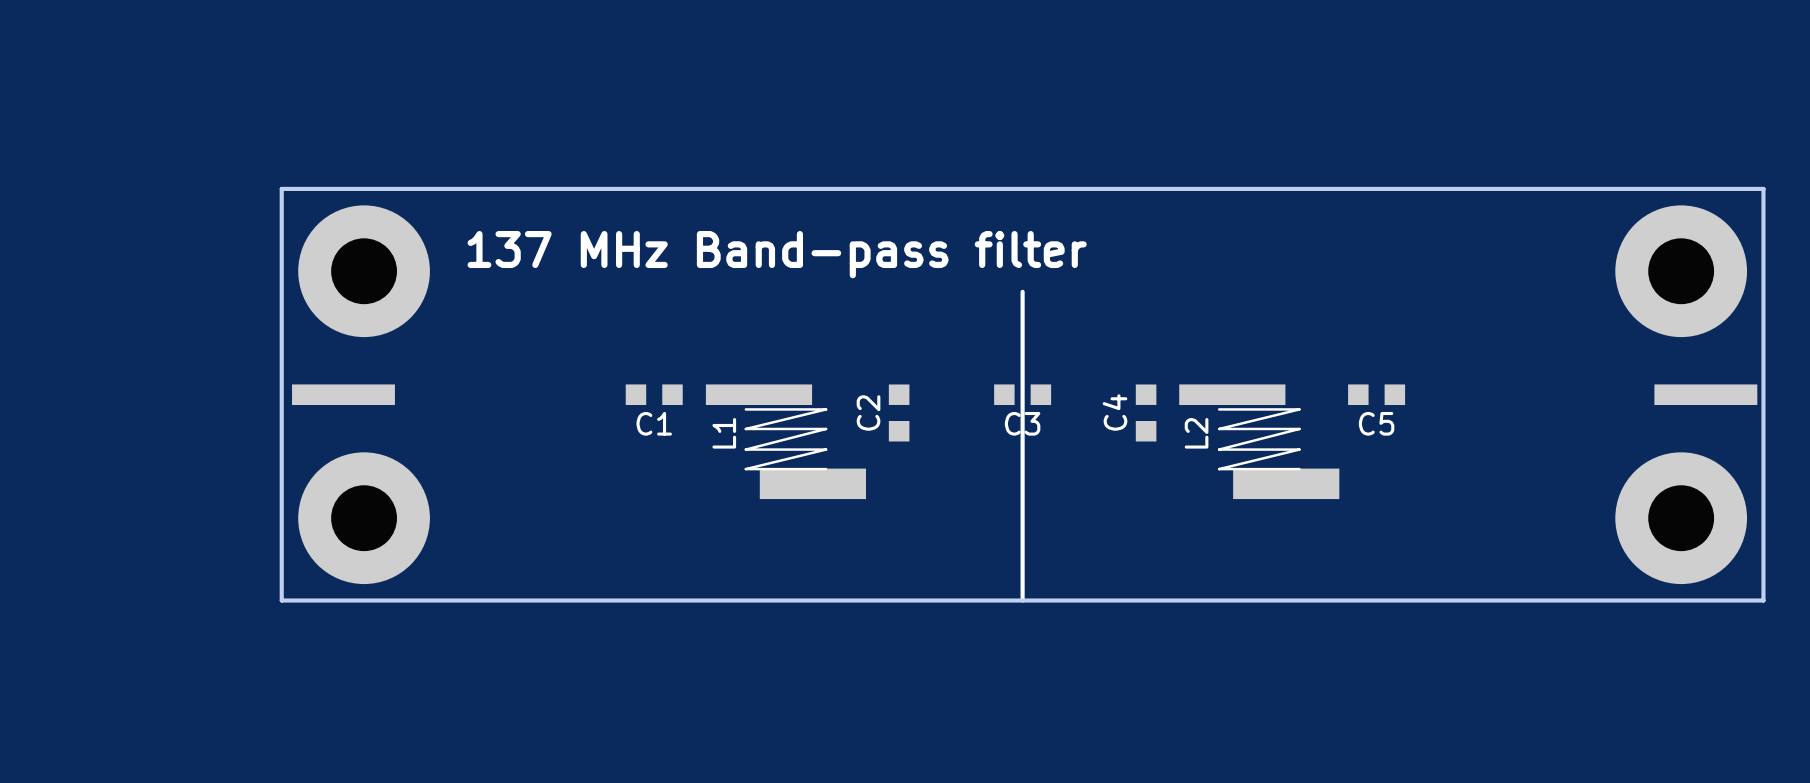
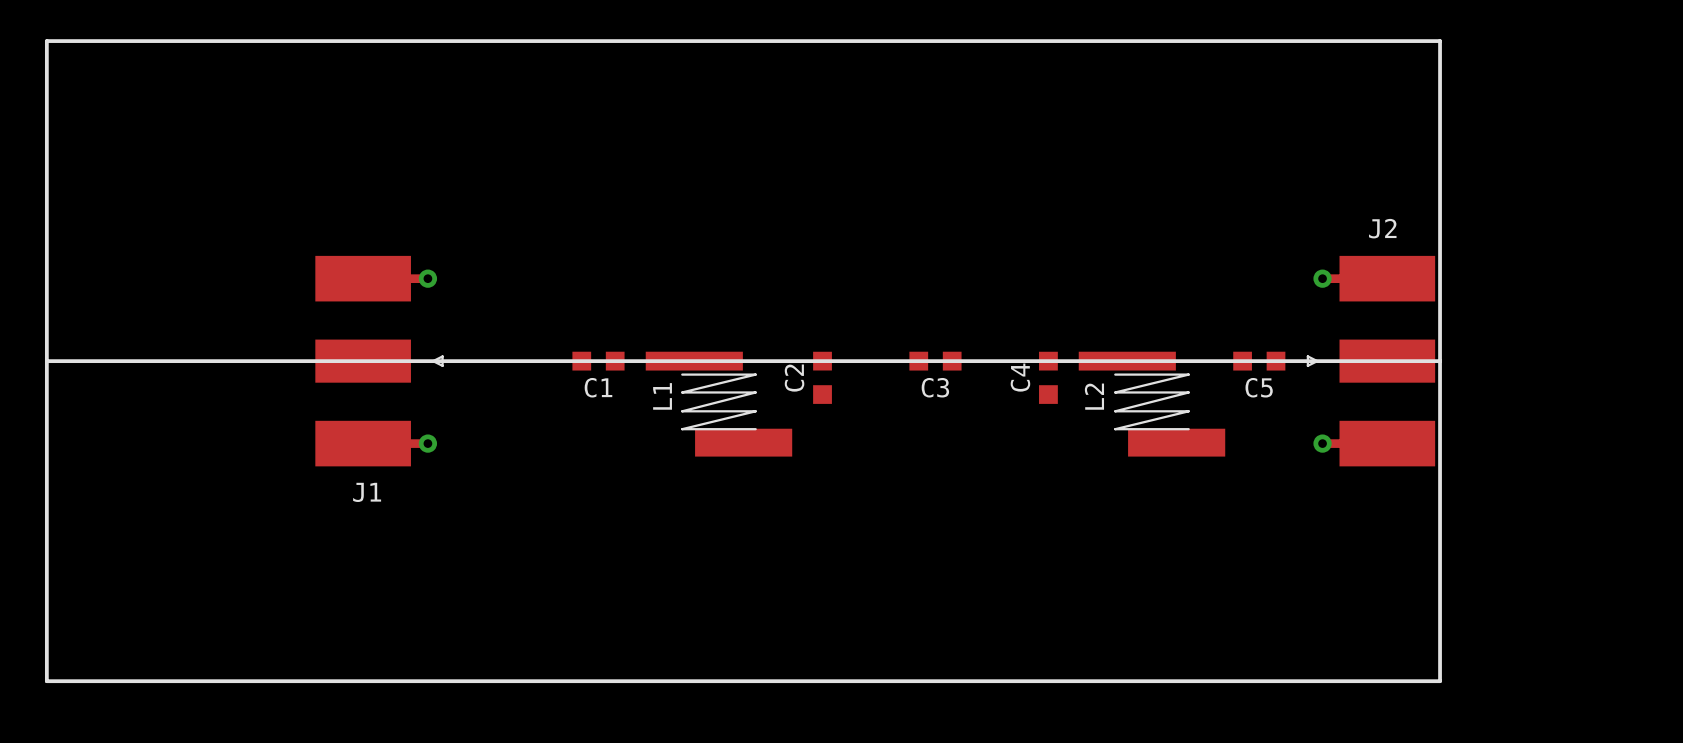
line: none -> (46, 41) (46, 681) (1440, 681) (1440, 41) (46, 41)
board edge: (281, 188) (281, 600) (1763, 600) (1763, 188) (281, 188) -> none
text: 137 MHz Band-pass filter (777, 254) -> none
part: (364, 271) -> none
part: (1681, 271) -> none
line: (1022, 291) (1022, 600) -> none
line: none -> (46, 361) (1440, 361)
part: (343, 394) -> none
J1: none -> (379, 361)
J2: none -> (1370, 361)
part: (1705, 394) -> none
part: (364, 518) -> none
part: (1681, 518) -> none

